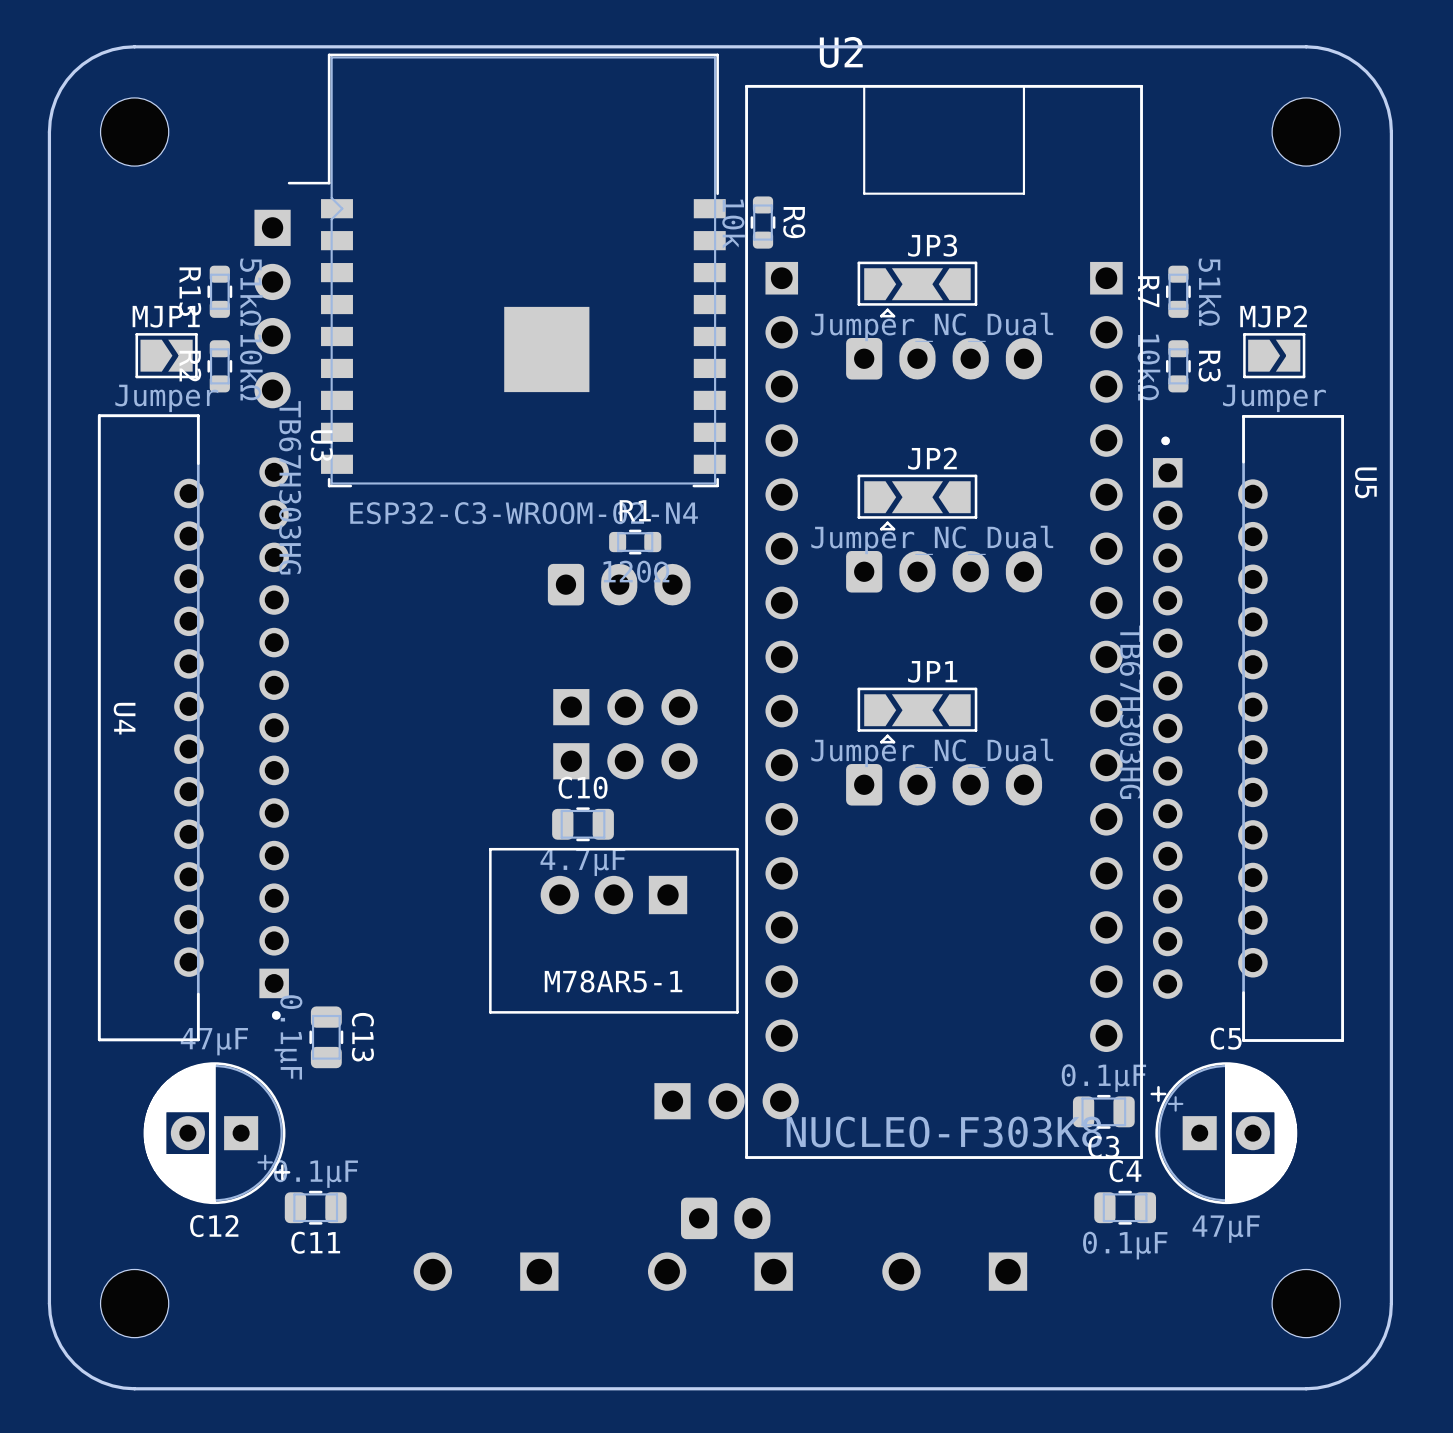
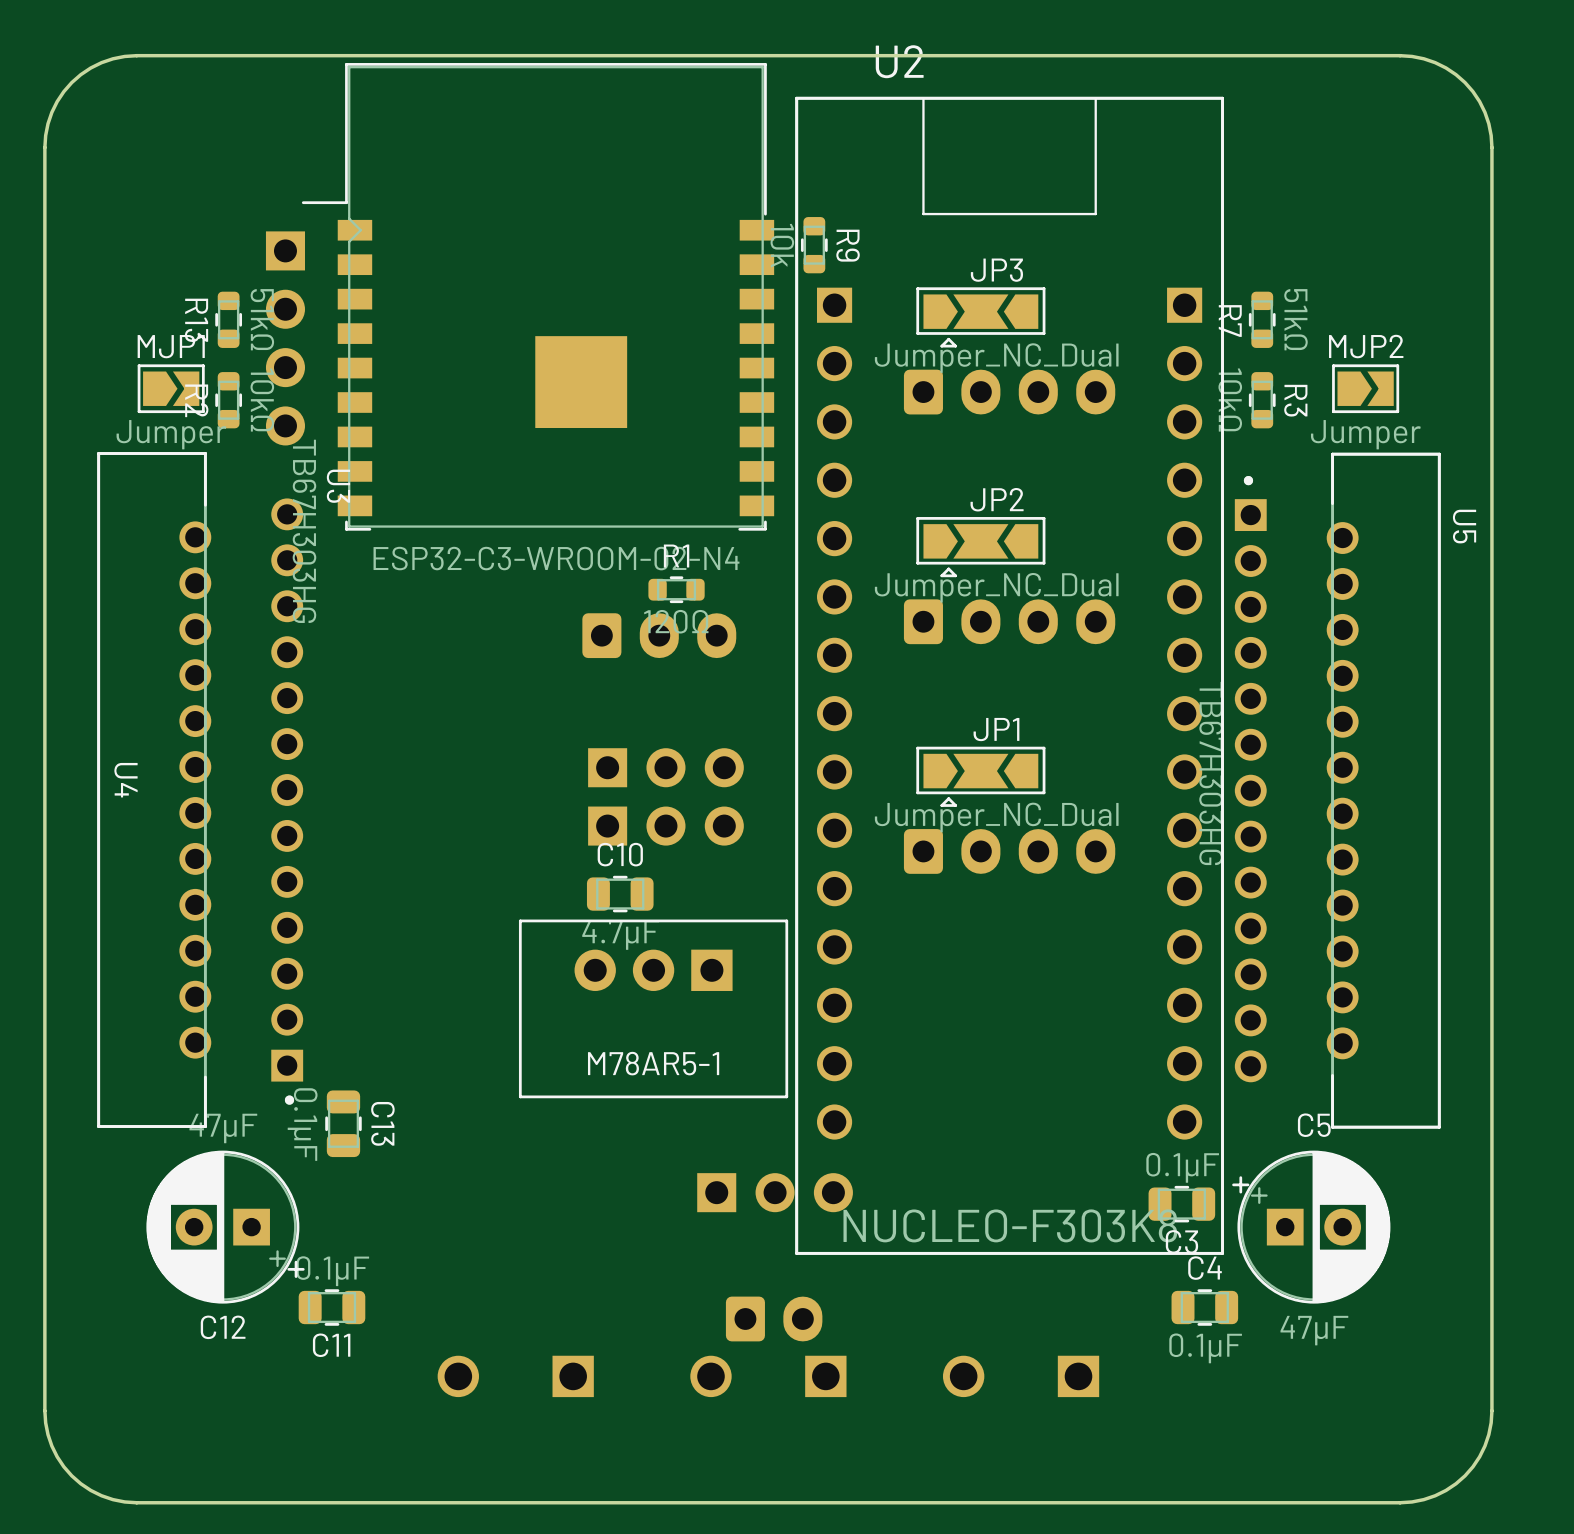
part: (134, 132) -> none
part: (1306, 132) -> none
part: (134, 1303) -> none
part: (1306, 1303) -> none

